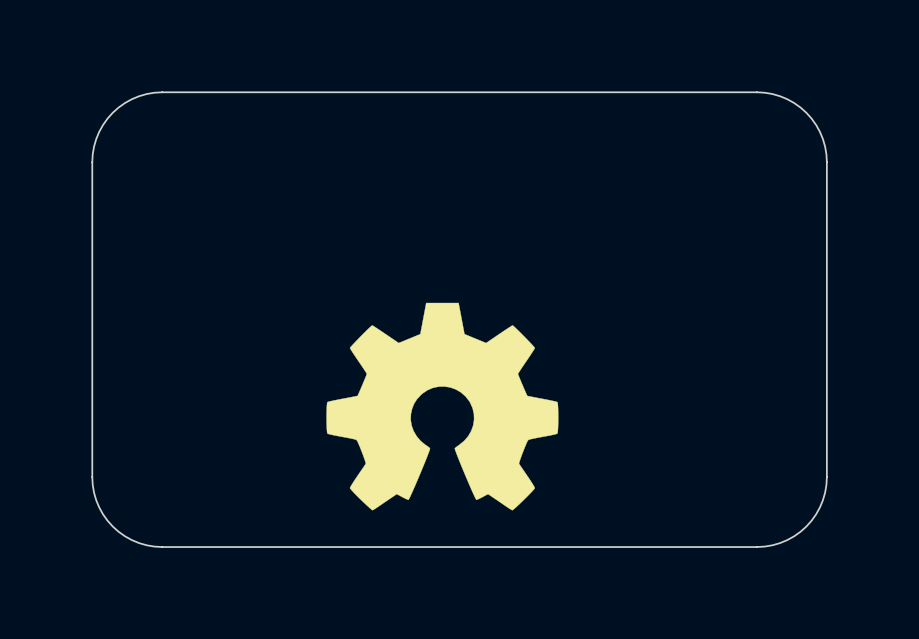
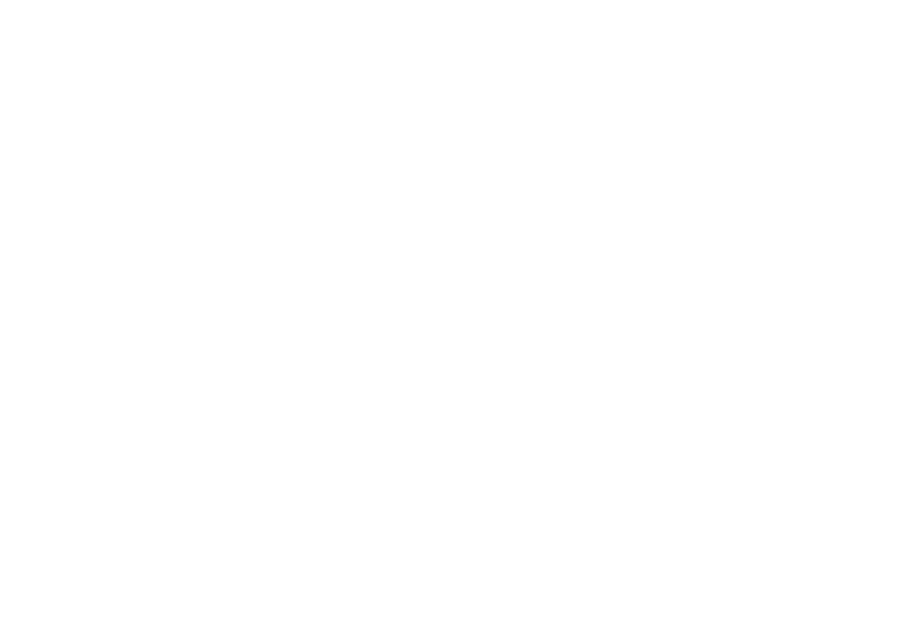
board edge: (162, 92) (756, 92) (772, 94) (794, 103) (806, 112) (816, 125) (822, 139) (826, 162) (826, 477) (822, 500) (816, 514) (806, 526) (787, 540) (772, 545) (756, 547) (162, 547) (139, 543) (125, 536) (112, 526) (103, 514) (96, 500) (92, 484) (92, 154) (99, 131) (112, 112) (131, 99) (146, 94) (162, 92) -> none
drawing: [326, 302, 559, 511] -> none

